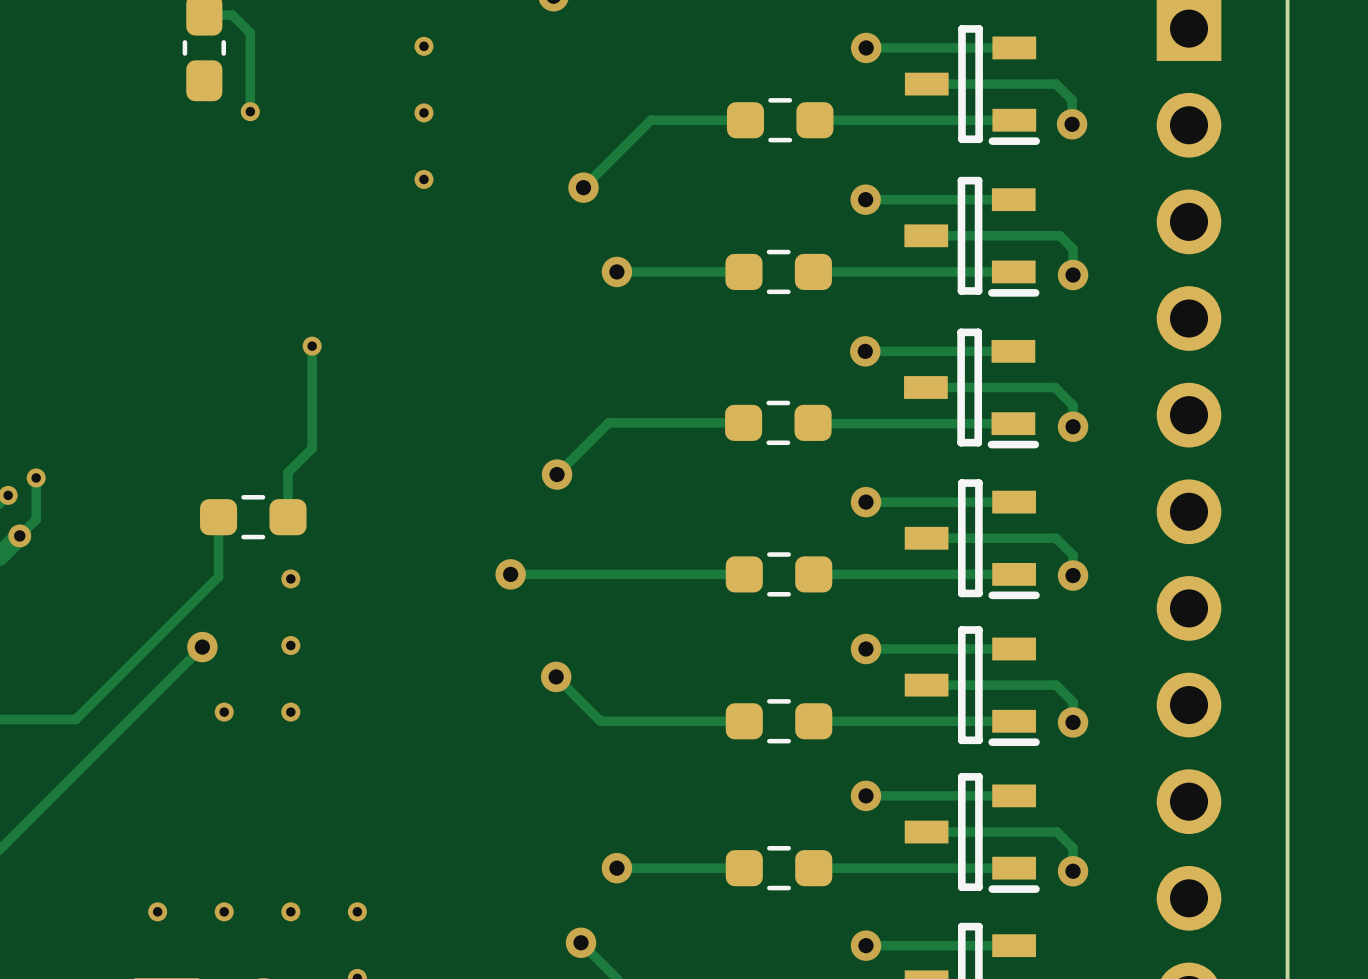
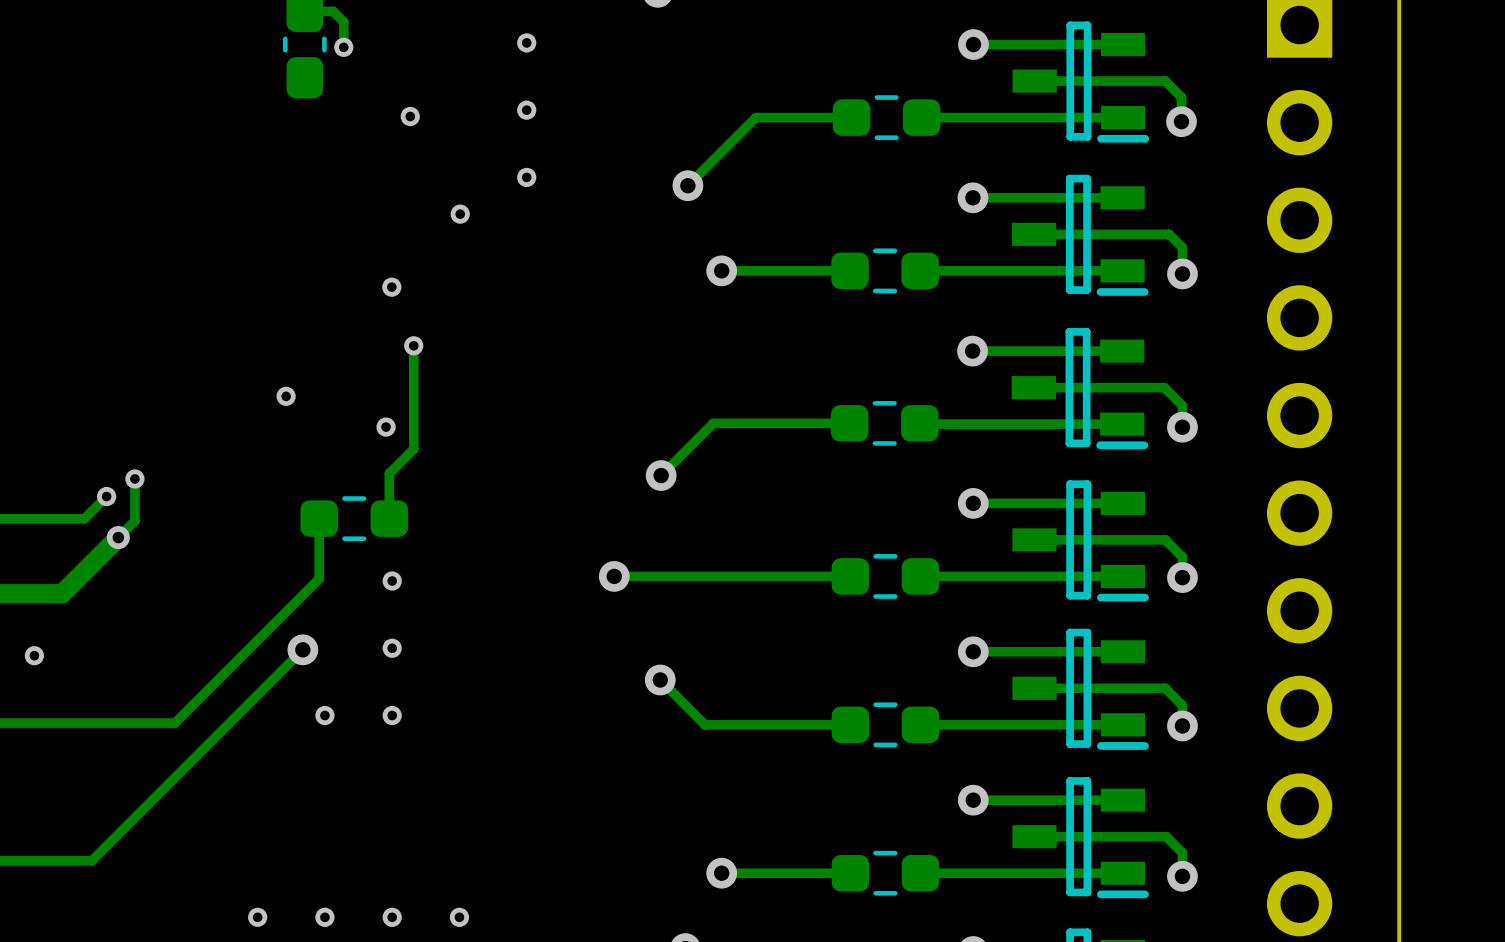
track: (242, 25) (250, 33) (250, 111) -> (343, 22) (343, 47)
via: none -> (343, 47)
via: (250, 111) -> none
via: none -> (410, 116)
via: none -> (460, 214)
via: none -> (391, 287)
via: none -> (286, 396)
via: none -> (386, 427)

